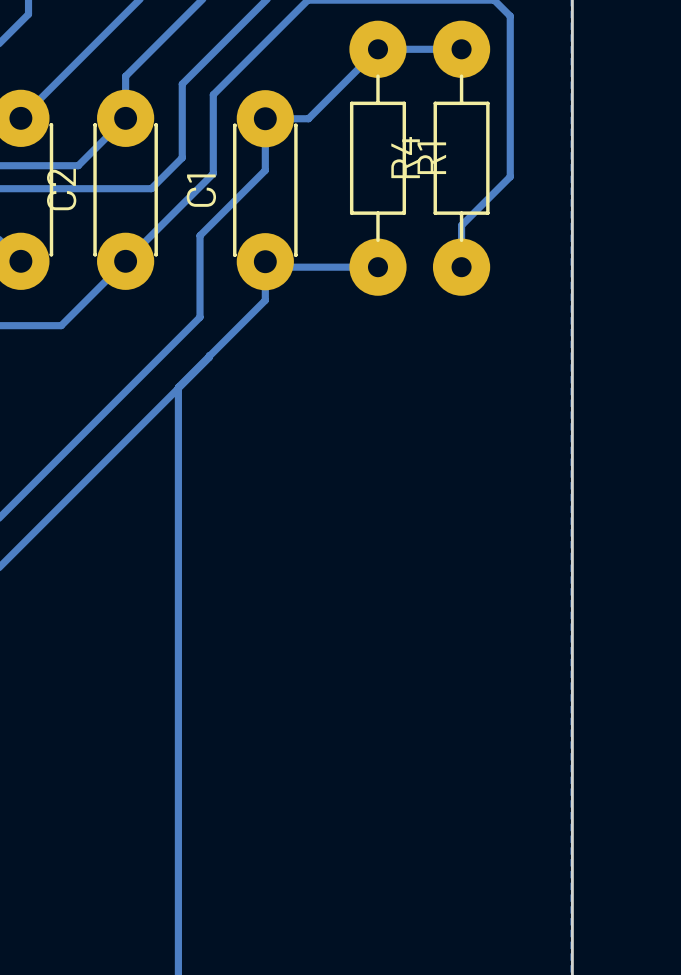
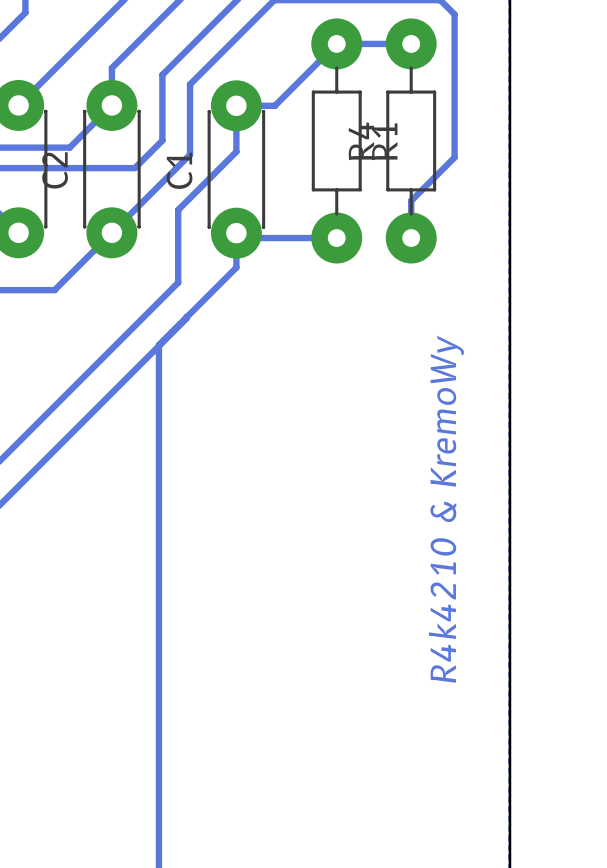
text: none -> R4k4210 & KremoWy (446, 509)

